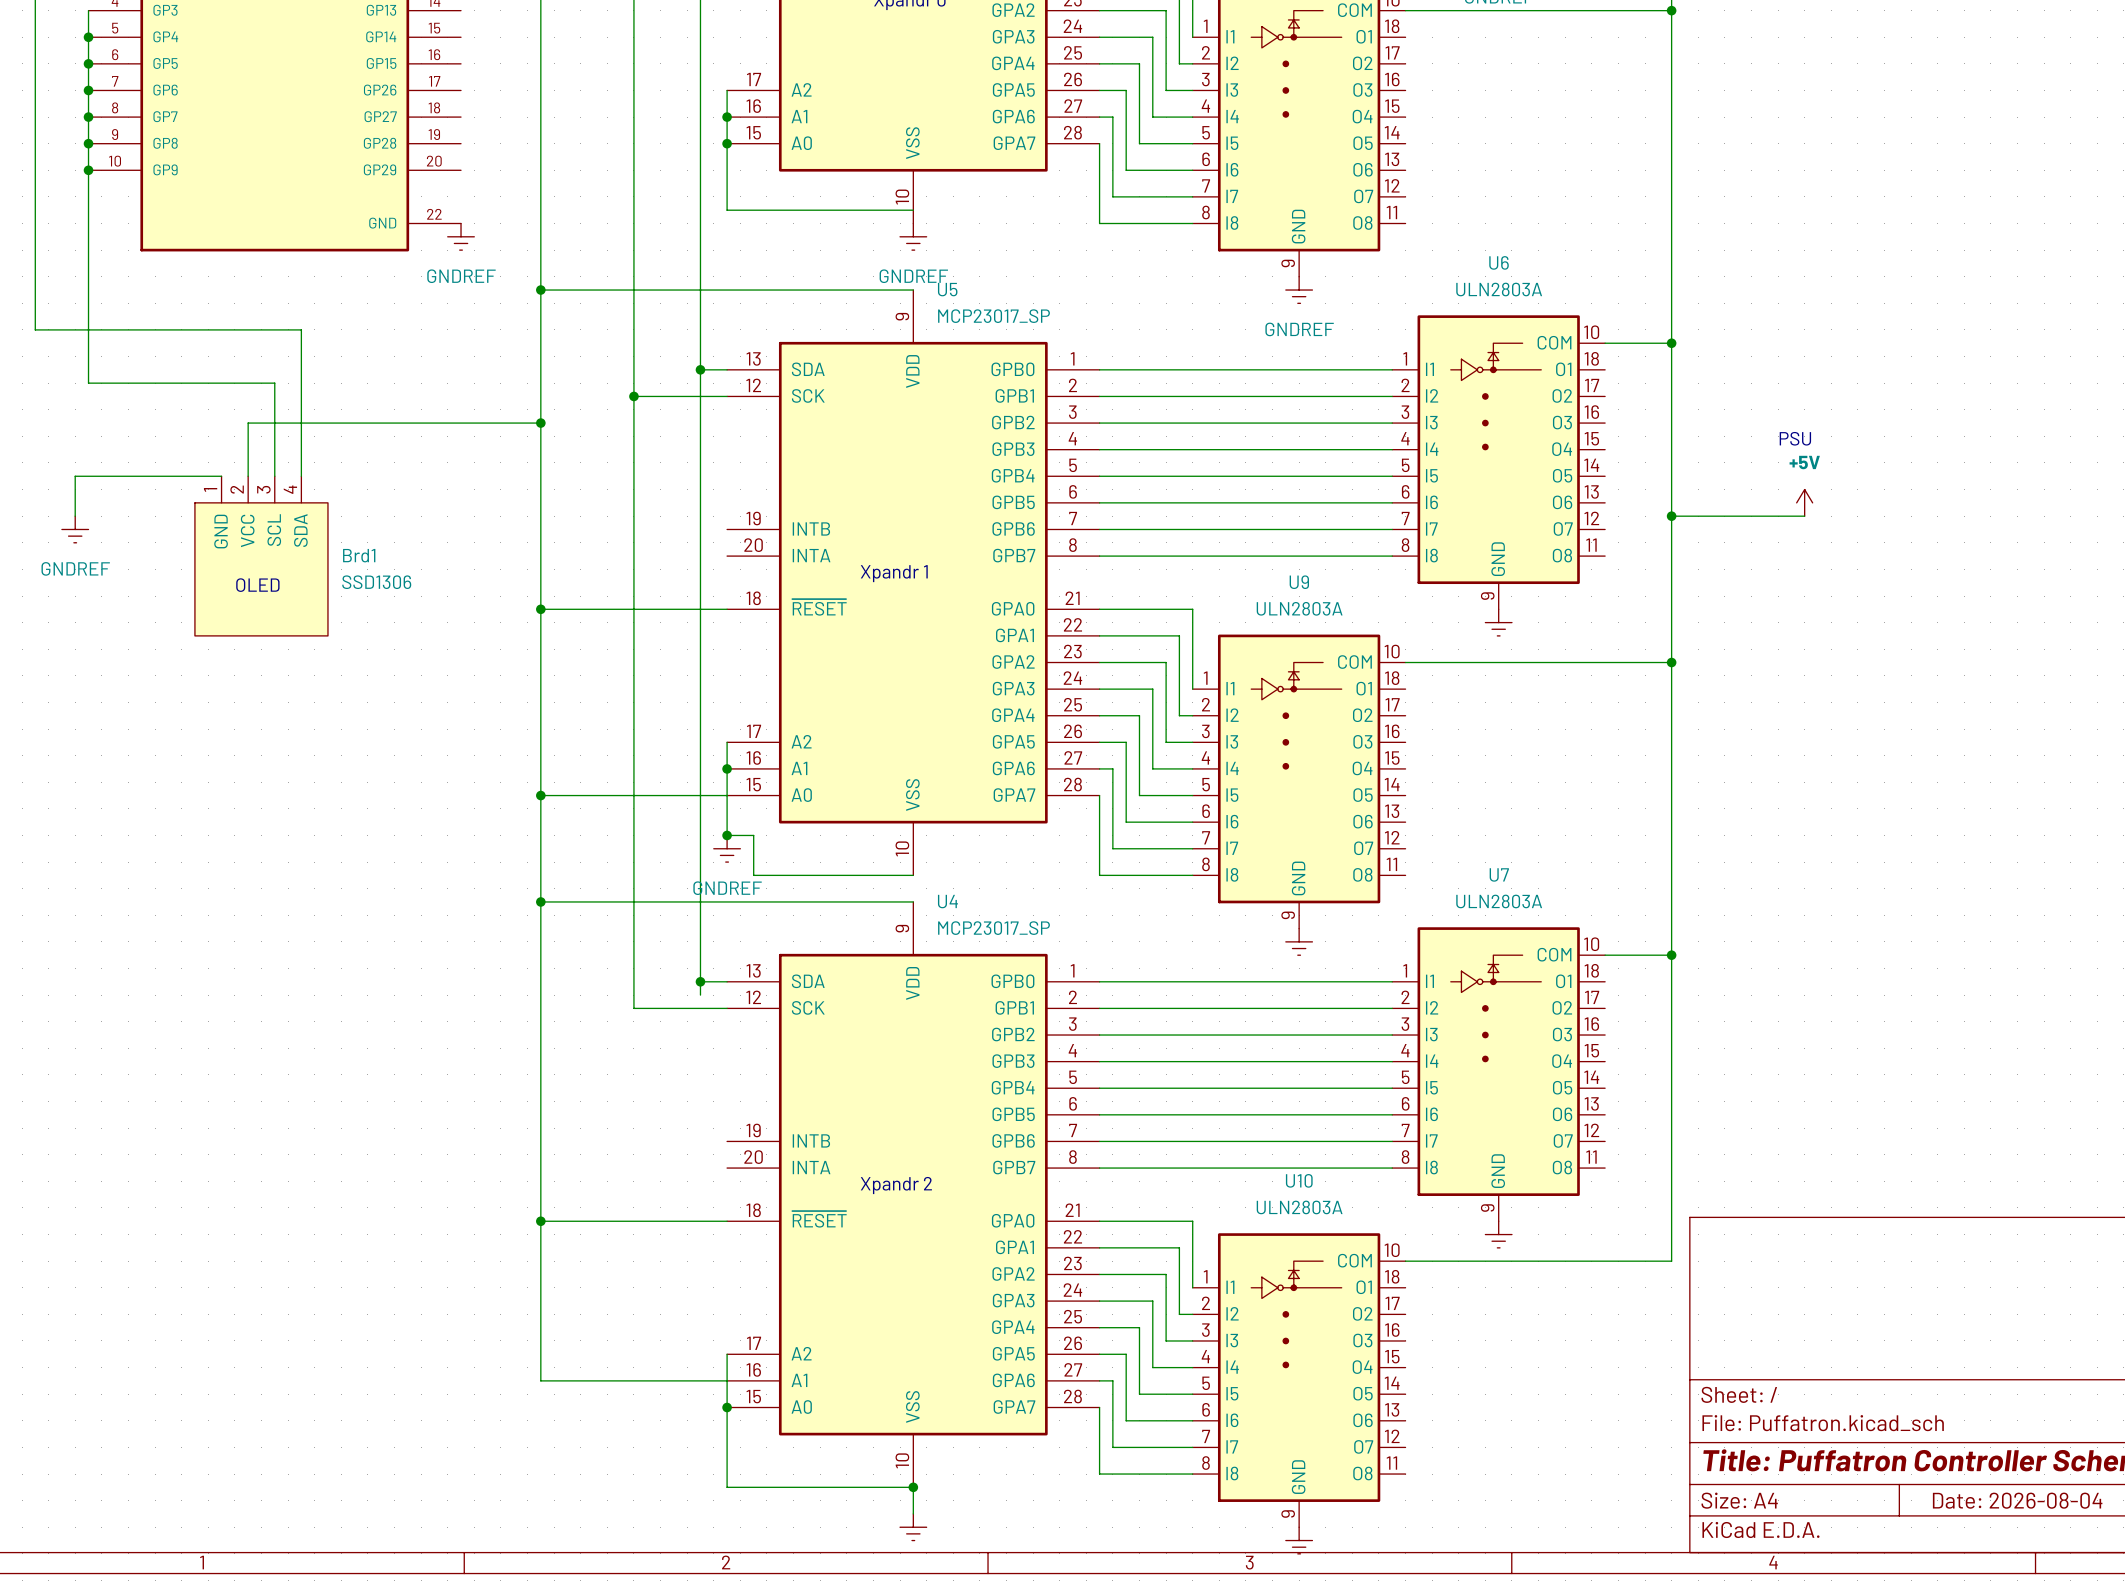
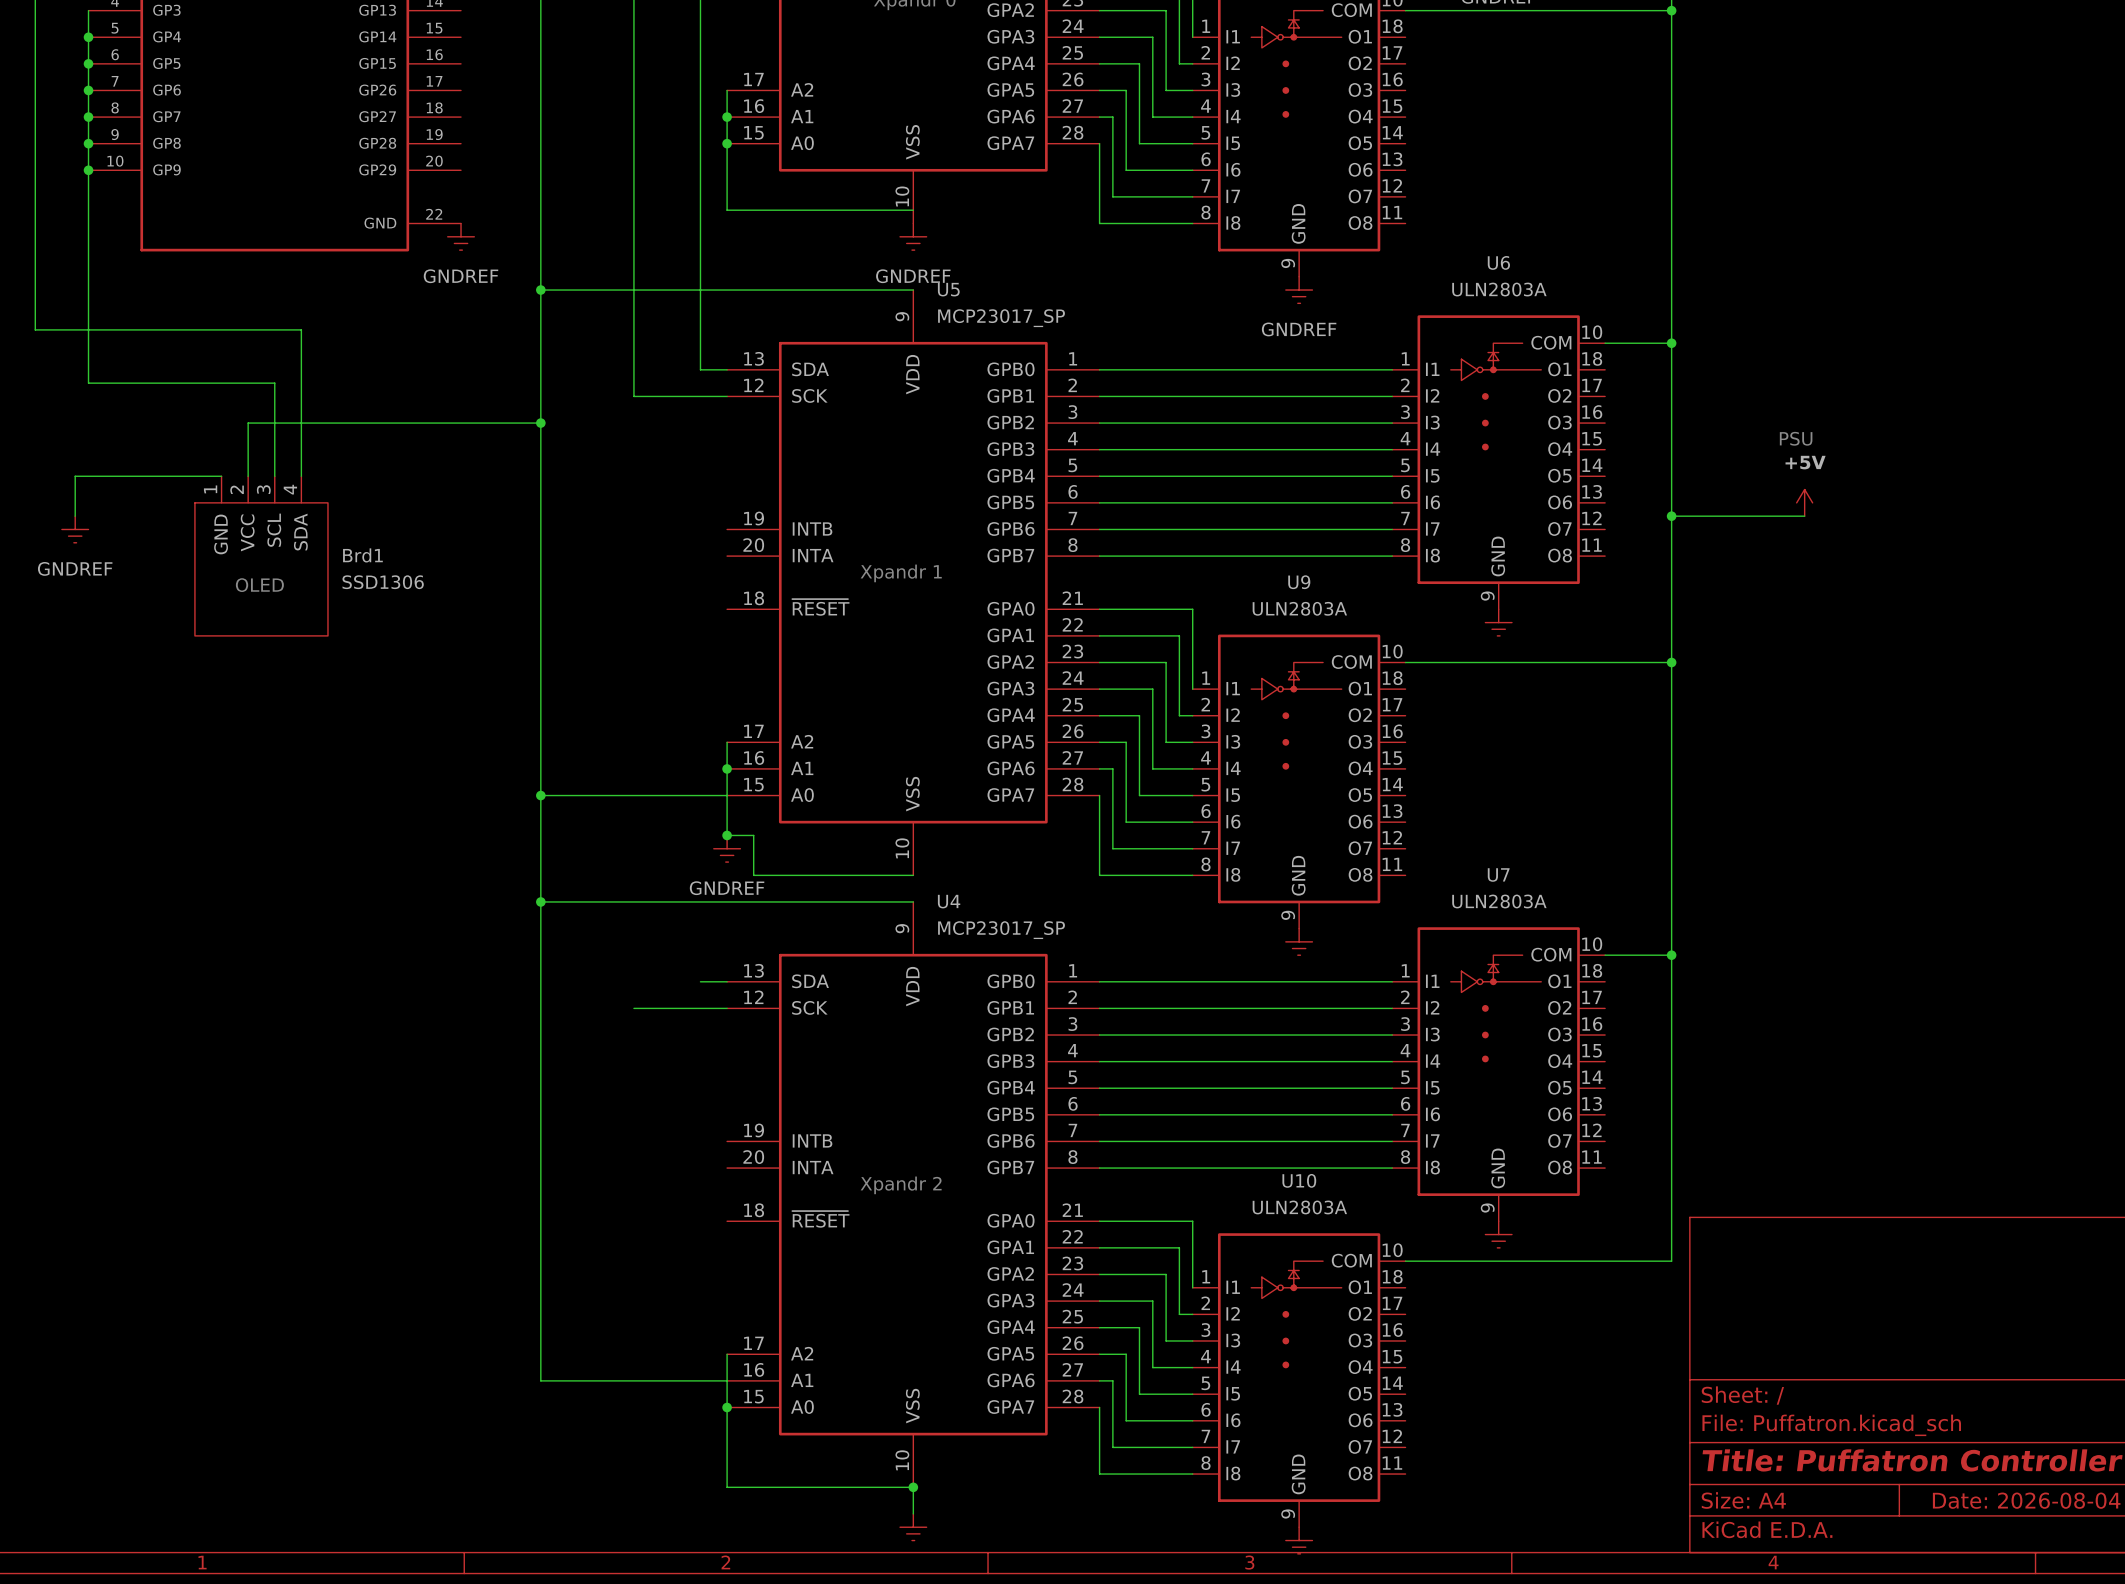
wire: (700, 369) (700, 995) -> none
junction: (700, 369) -> none
wire: (633, 396) (633, 1008) -> none
junction: (633, 396) -> none
wire: (540, 609) (727, 609) -> none
junction: (540, 609) -> none
junction: (700, 981) -> none
wire: (540, 1221) (727, 1221) -> none
junction: (540, 1221) -> none

